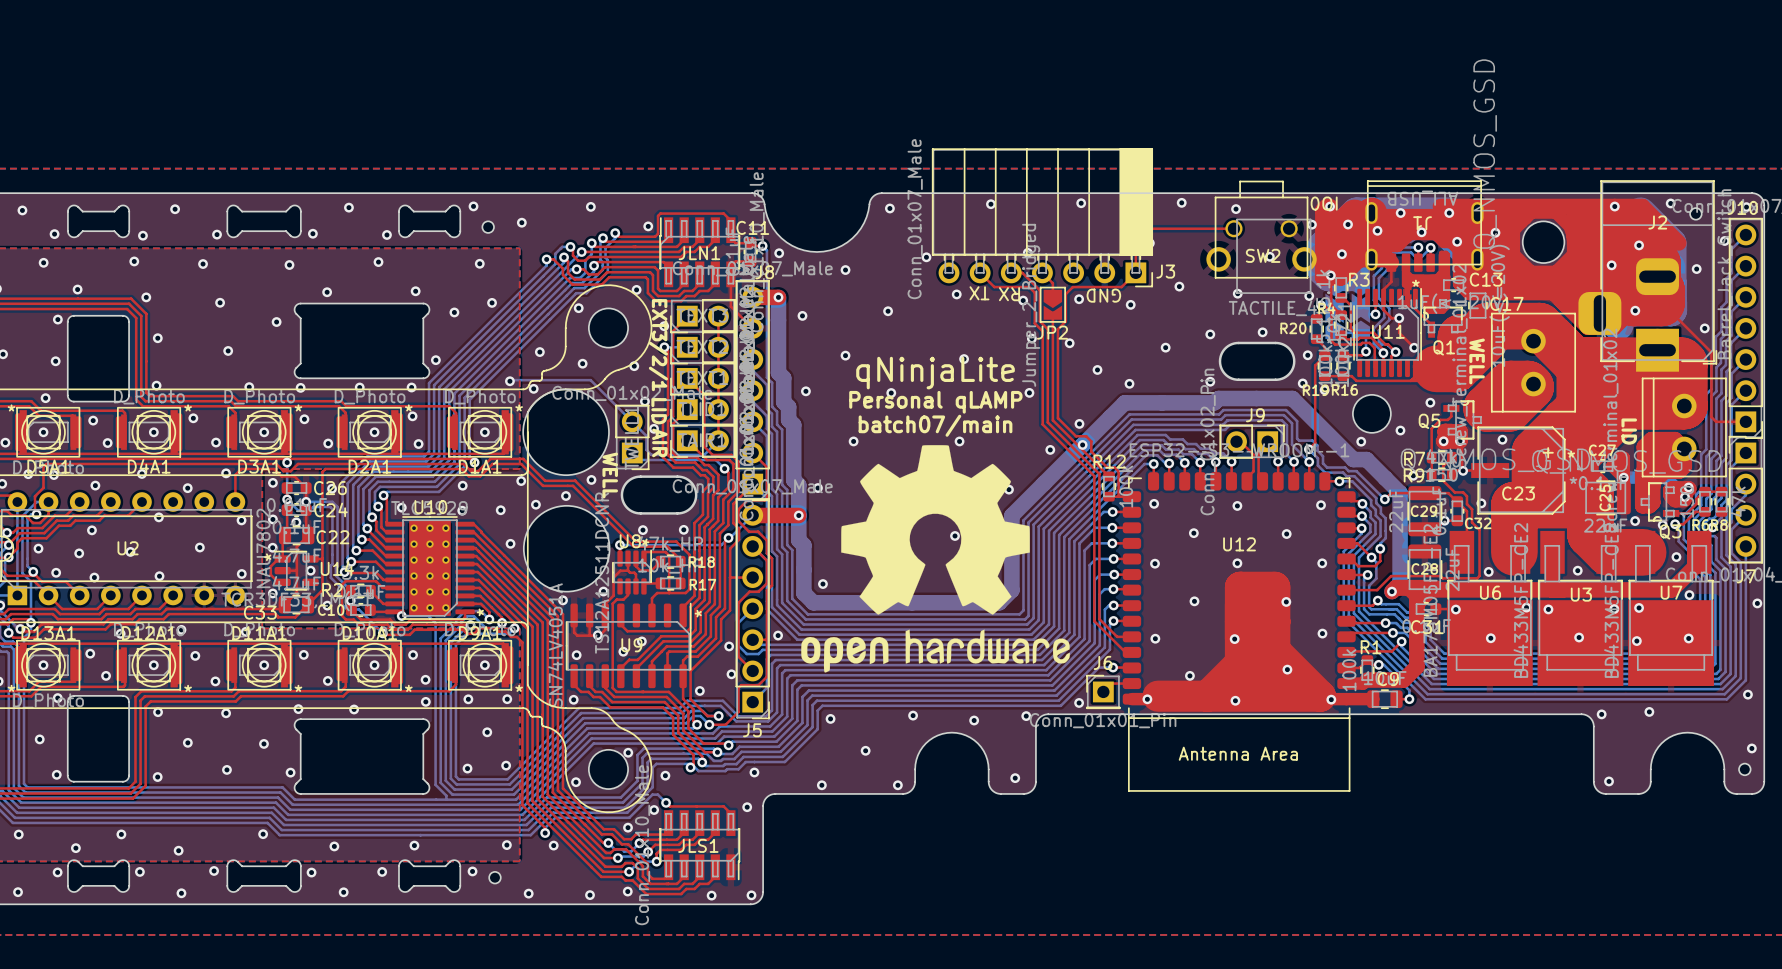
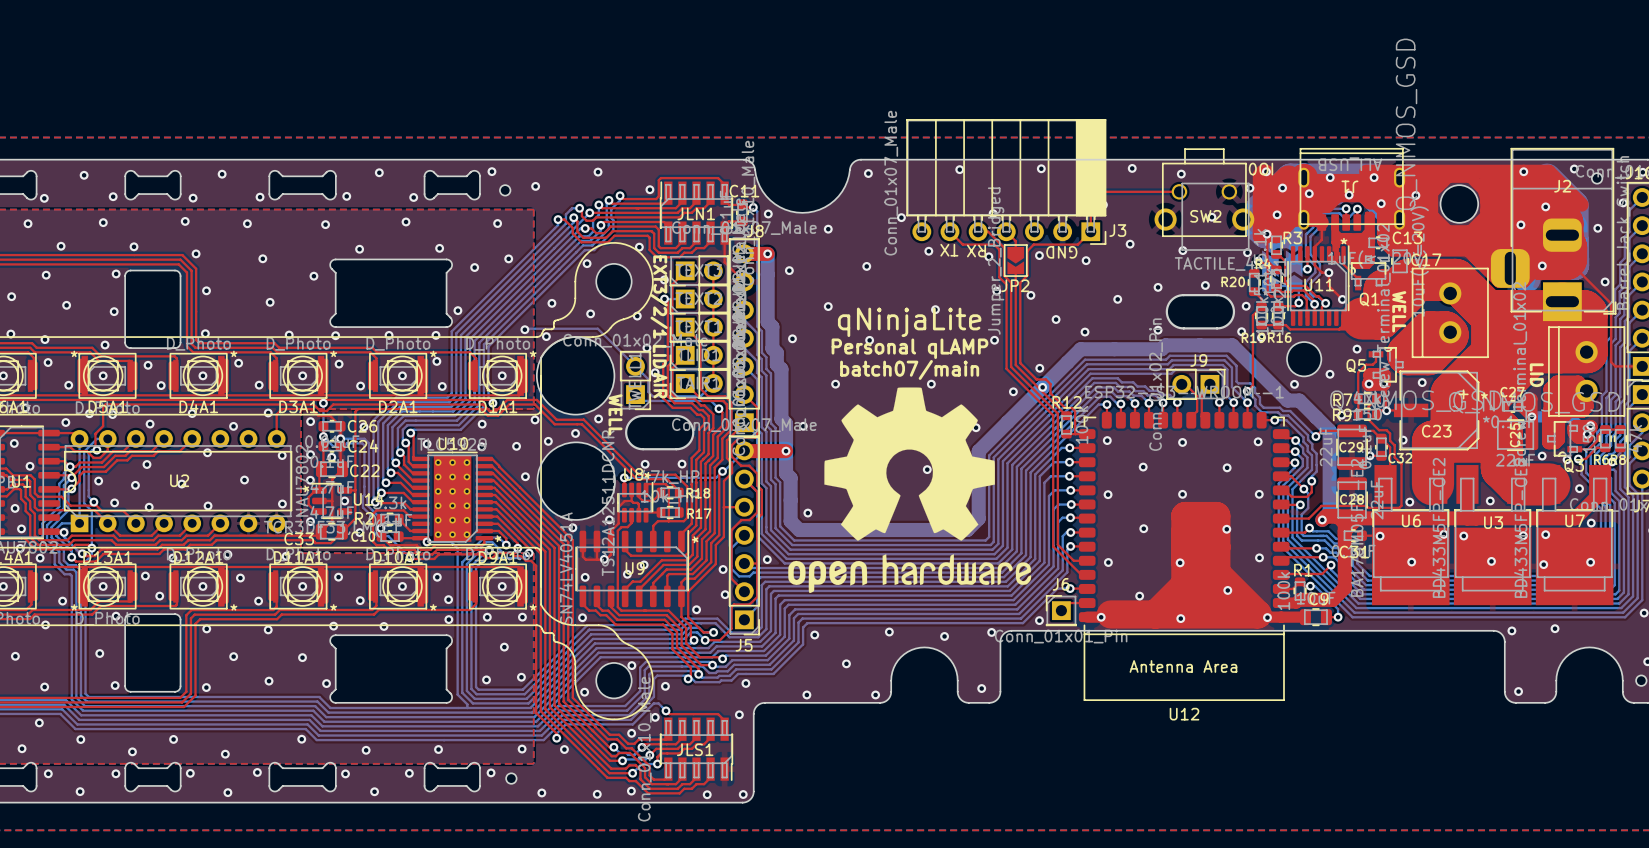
U12 name position: U12 (1239, 544) -> U12 (1184, 714)

